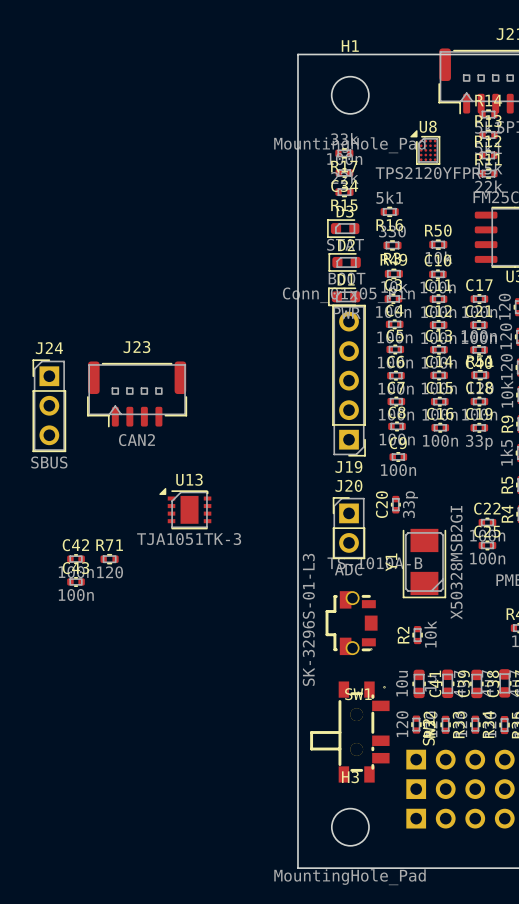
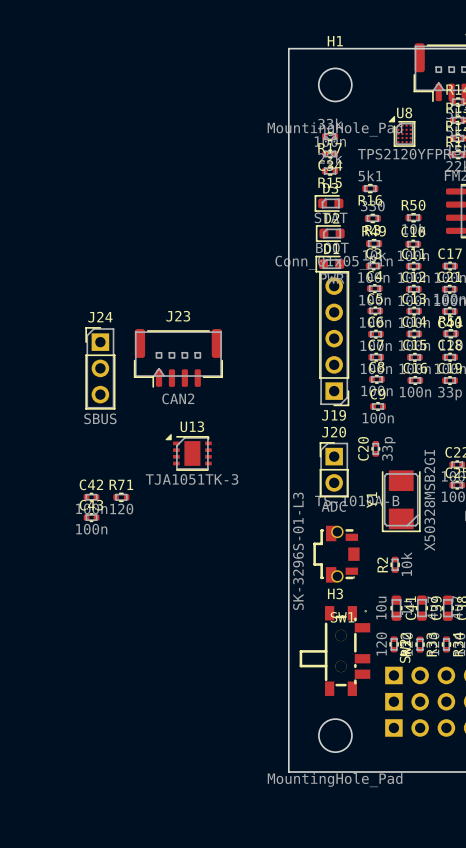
J23 position: (137, 394) -> (178, 358)
J24 position: (49, 405) -> (100, 368)
H3 name position: H3 (350, 777) -> H3 (335, 593)

